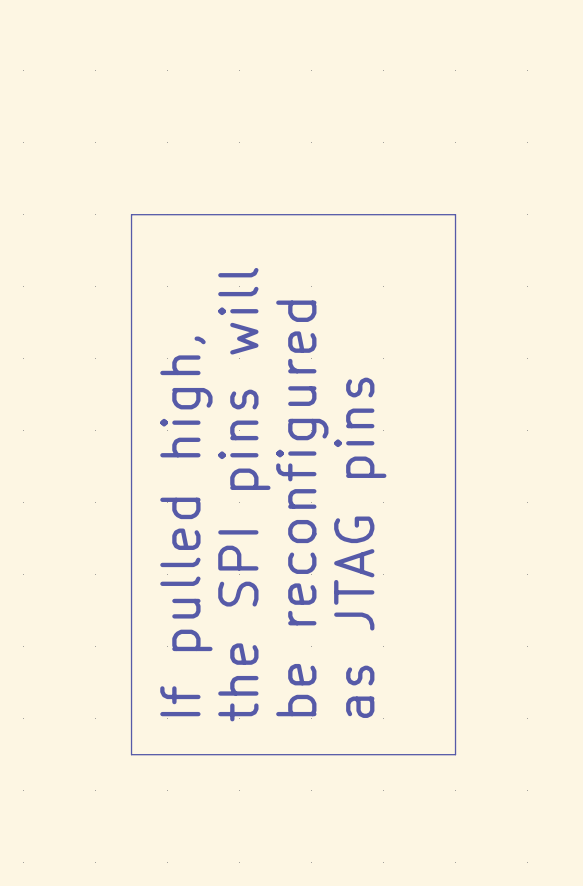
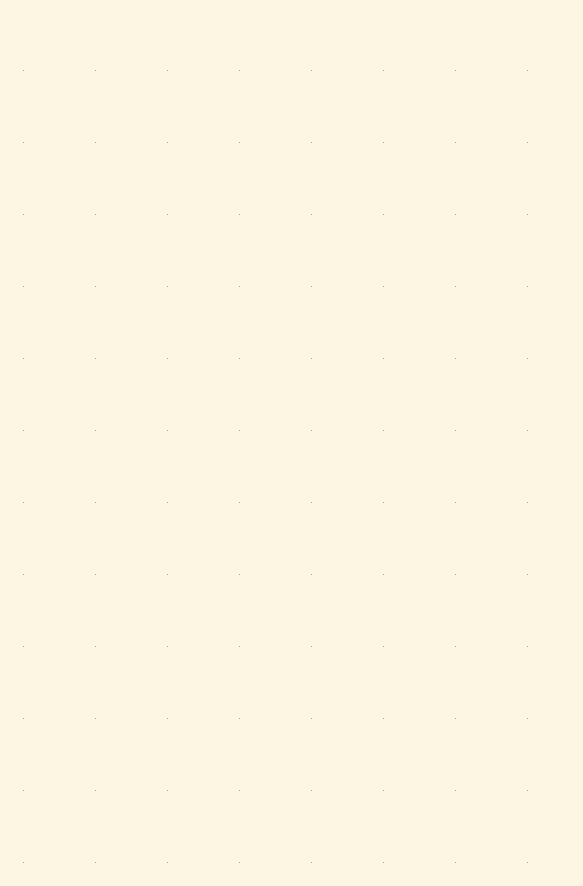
line: (131, 214) (455, 214) (455, 754) (131, 754) (131, 214) -> none
text: the SPI pins will (244, 494) -> none
text: be reconfigured (302, 508) -> none
text: If pulled high, (186, 526) -> none
text: as JTAG pins (360, 547) -> none

